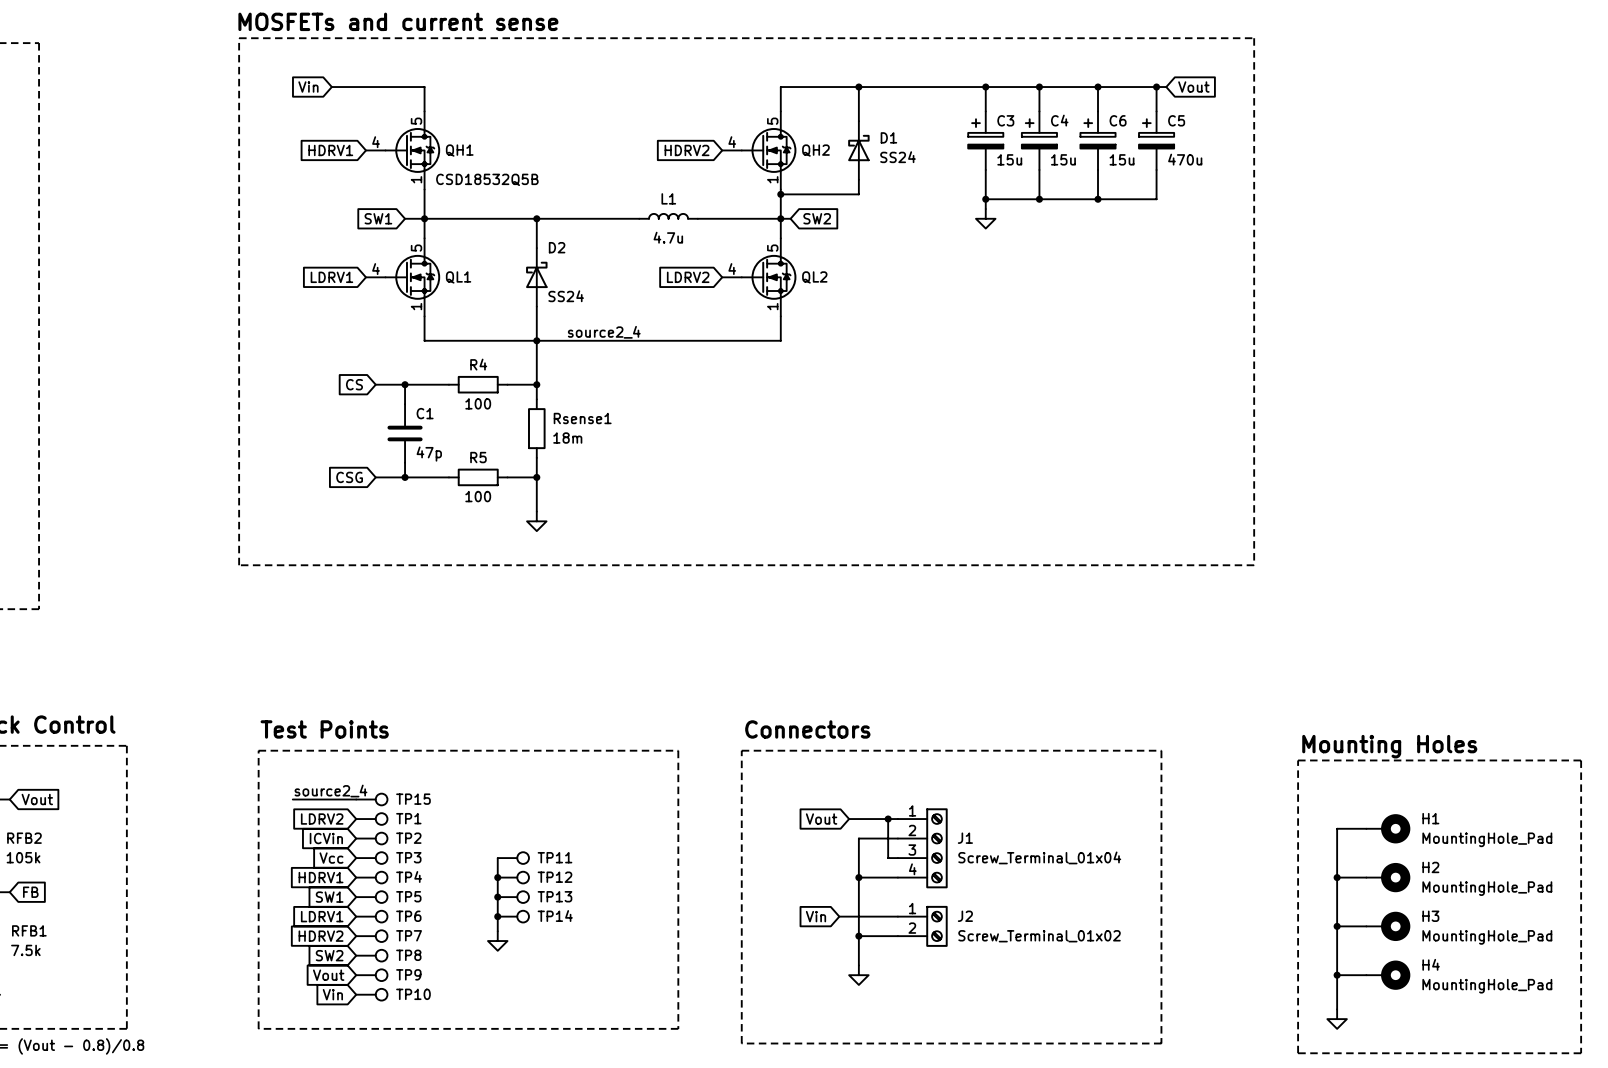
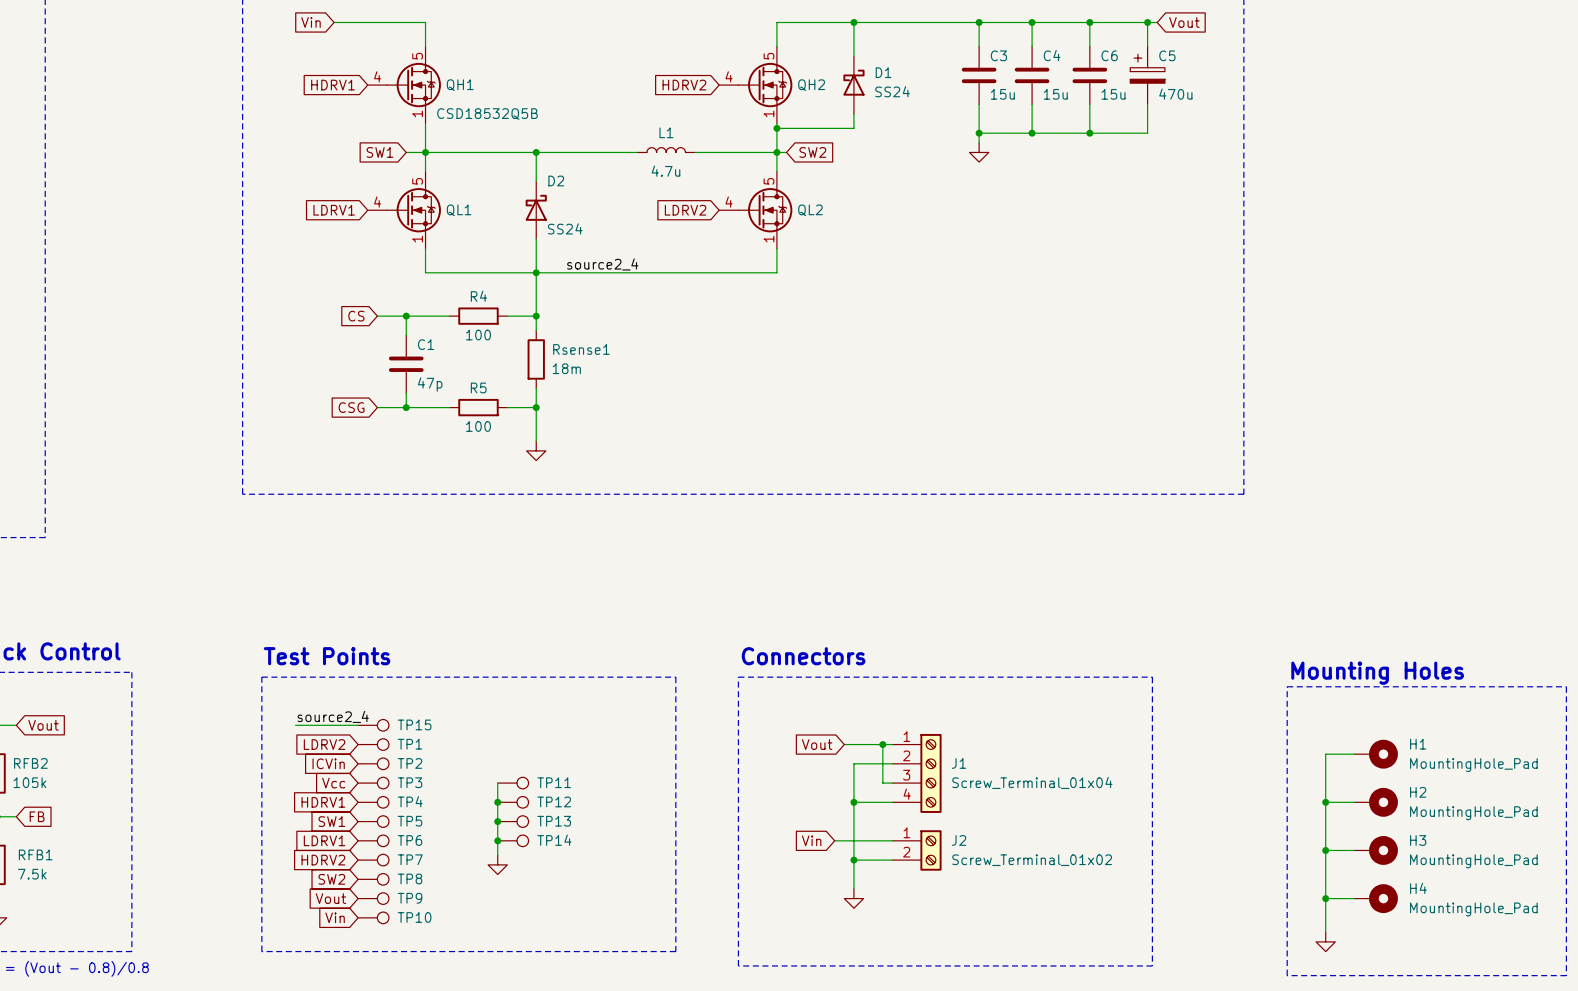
C3 symbol: [968, 111, 1004, 170] -> [961, 46, 997, 105]
C4 symbol: [1021, 111, 1058, 170] -> [1014, 46, 1050, 105]
C6 symbol: [1080, 111, 1116, 170] -> [1072, 46, 1108, 105]

